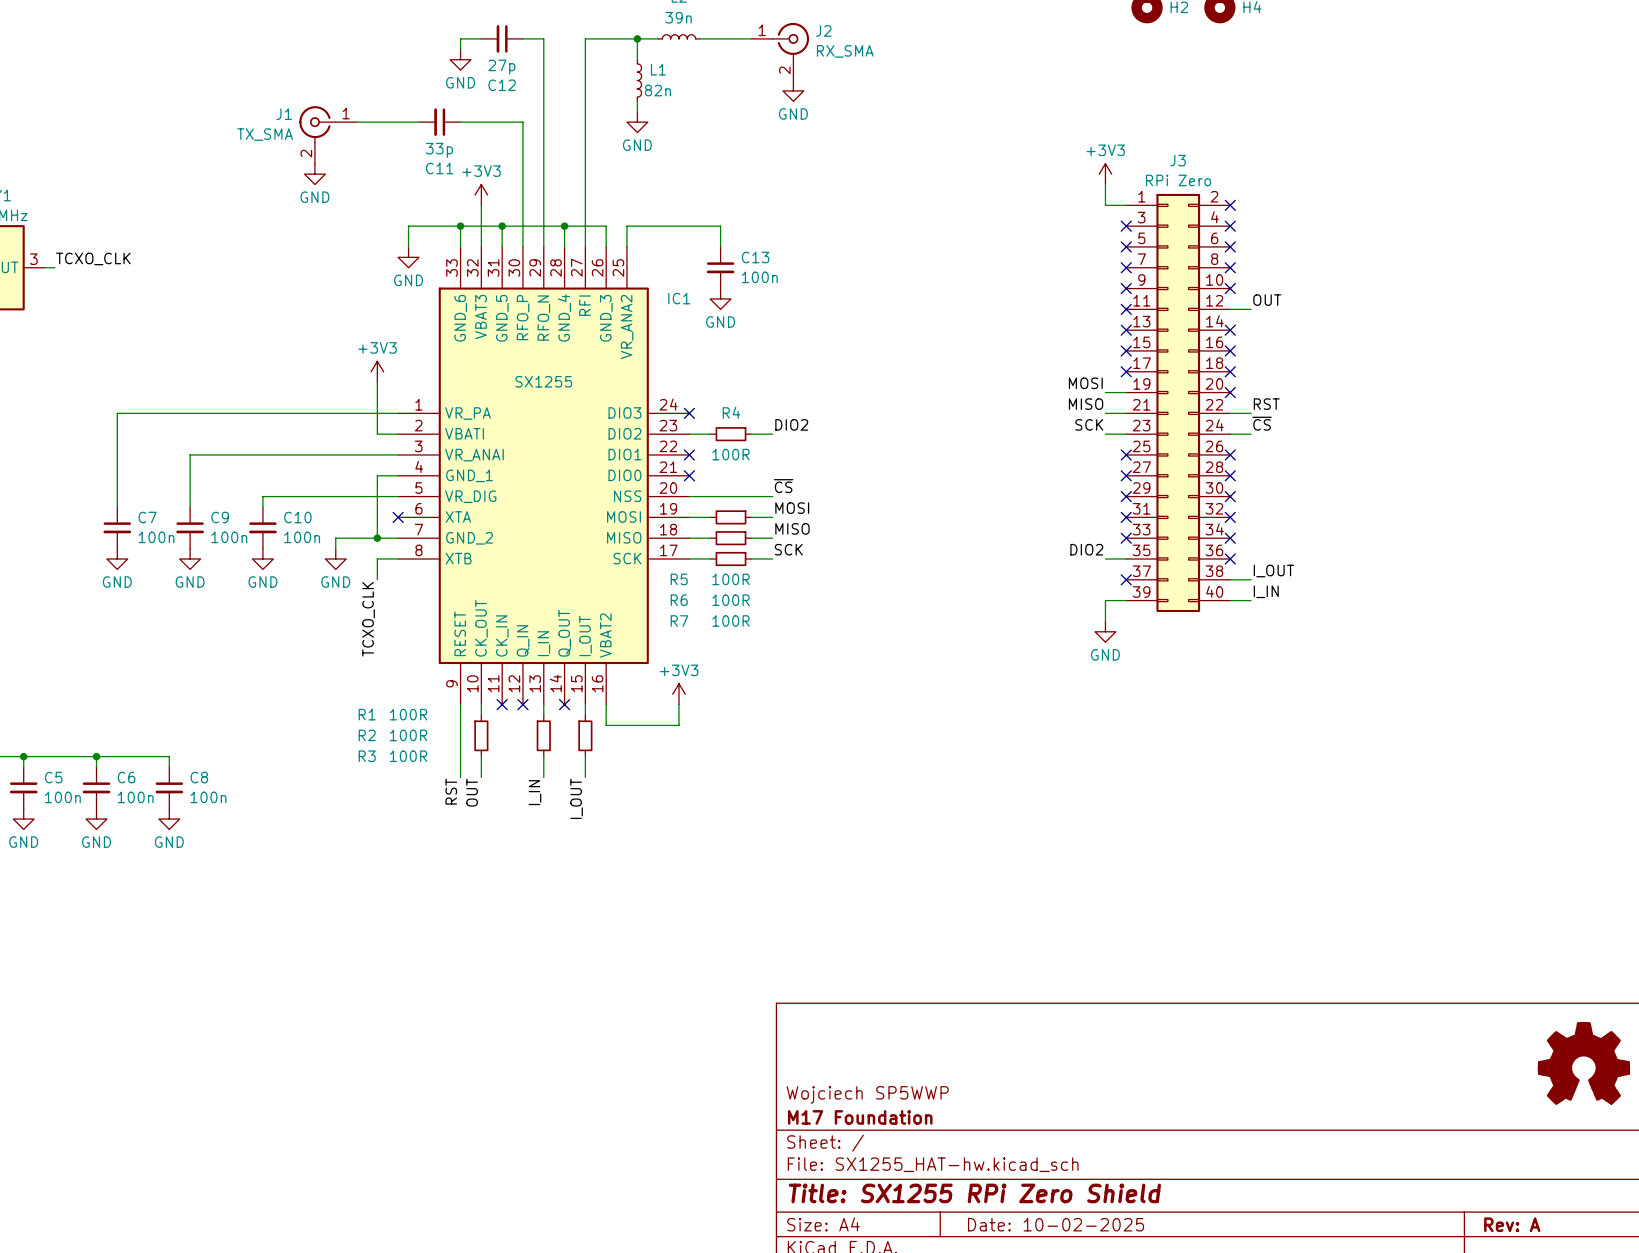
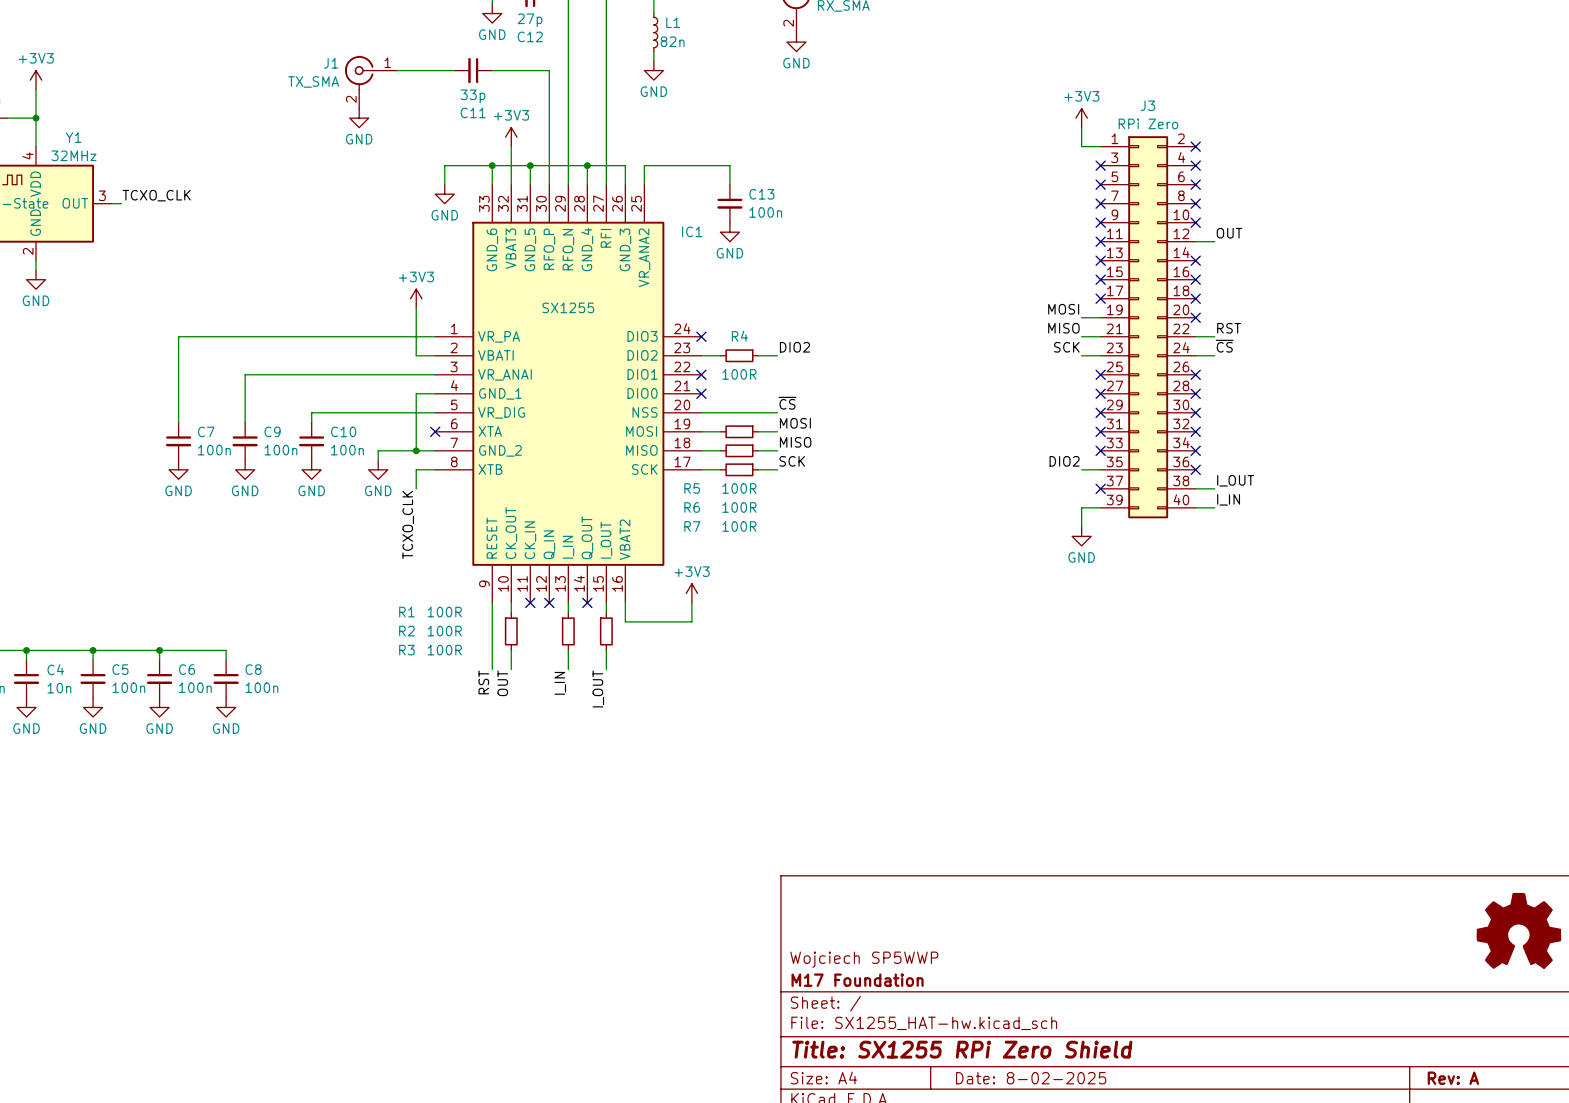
title block: Date: 10-02-2025 (1056, 1224) -> Date: 8-02-2025 (1031, 1078)

